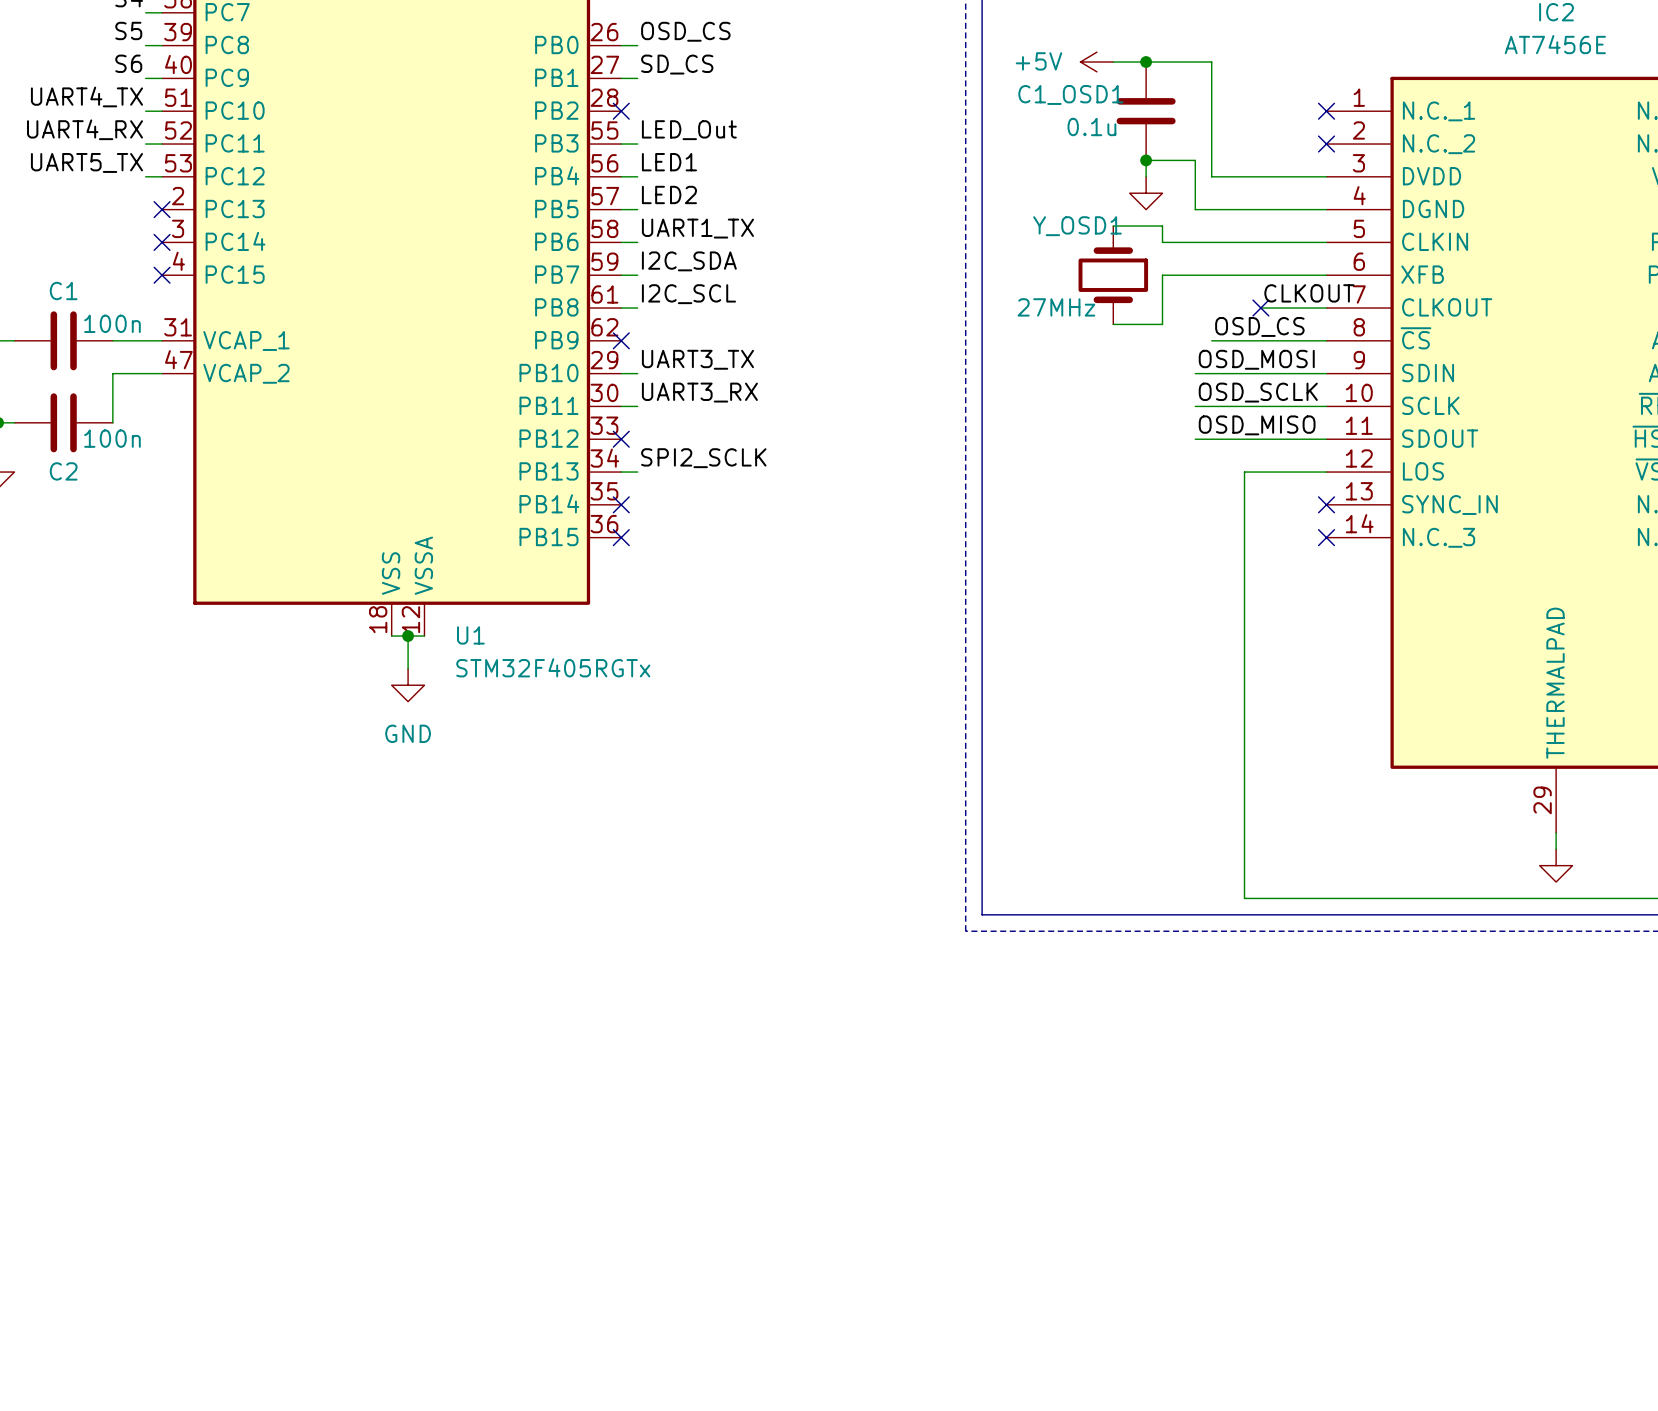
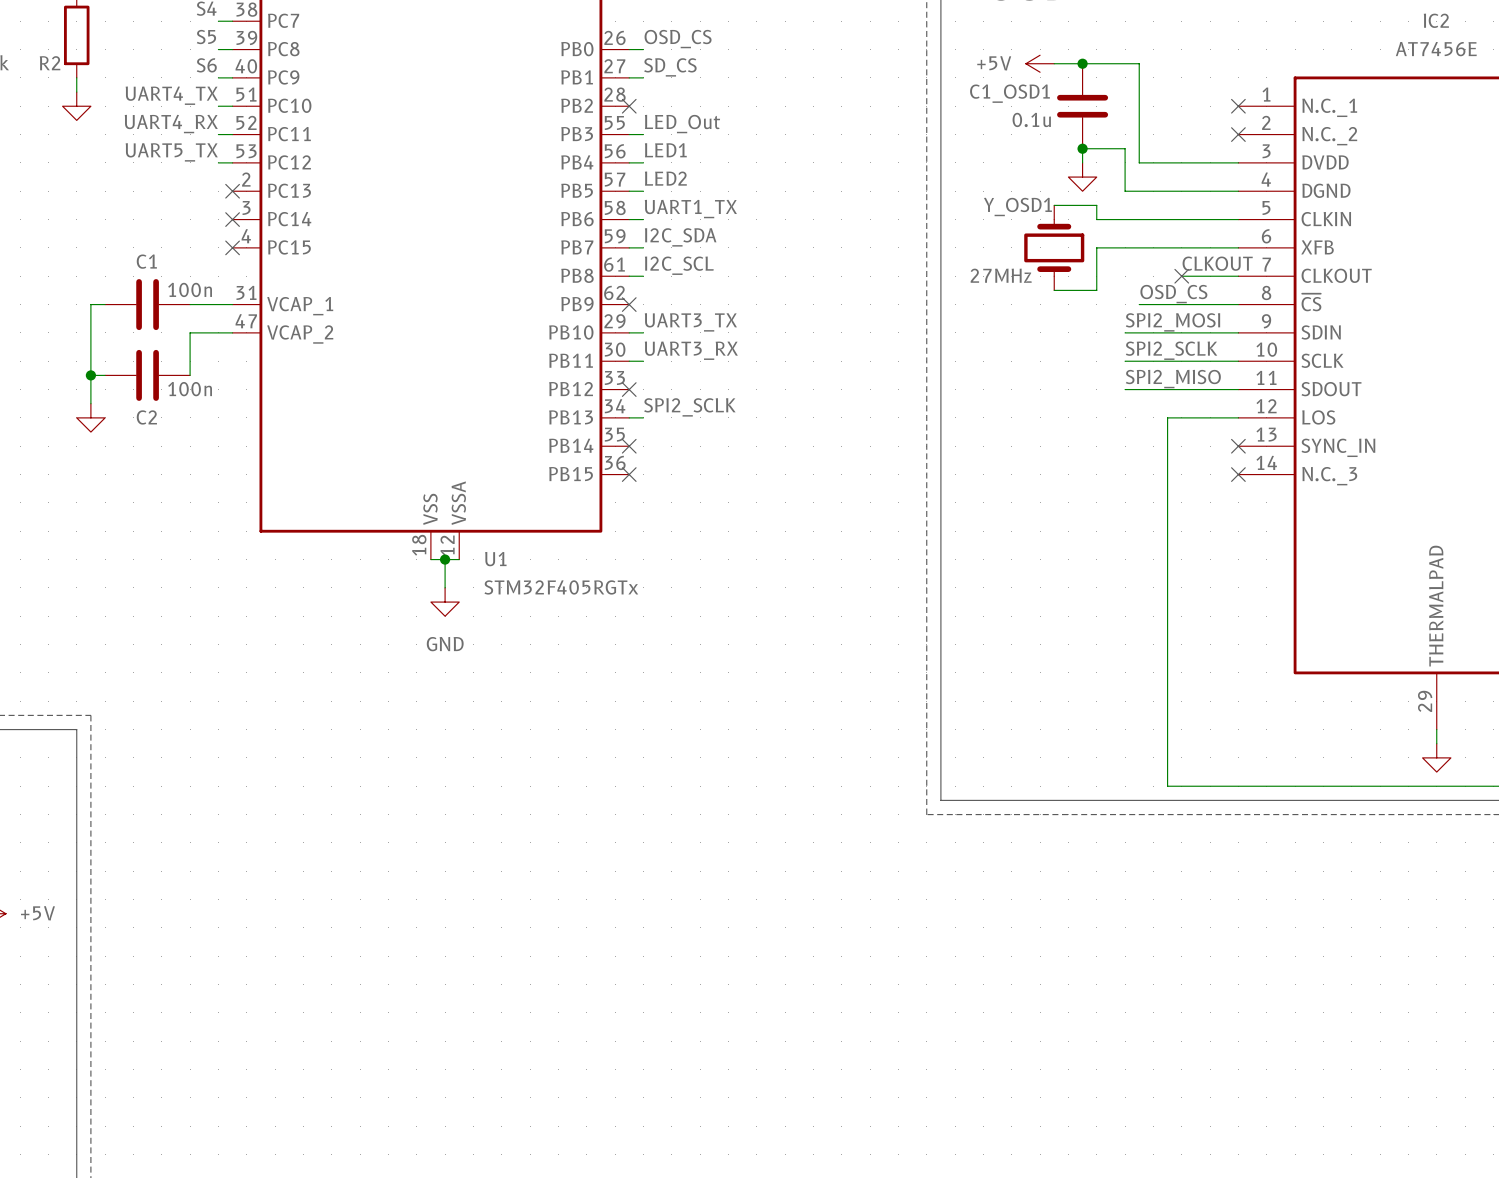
label: OSD_MOSI (1256, 359) -> SPI2_MOSI (1172, 322)
label: OSD_SCLK (1258, 392) -> SPI2_SCLK (1171, 350)
label: OSD_MISO (1257, 425) -> SPI2_MISO (1173, 379)

